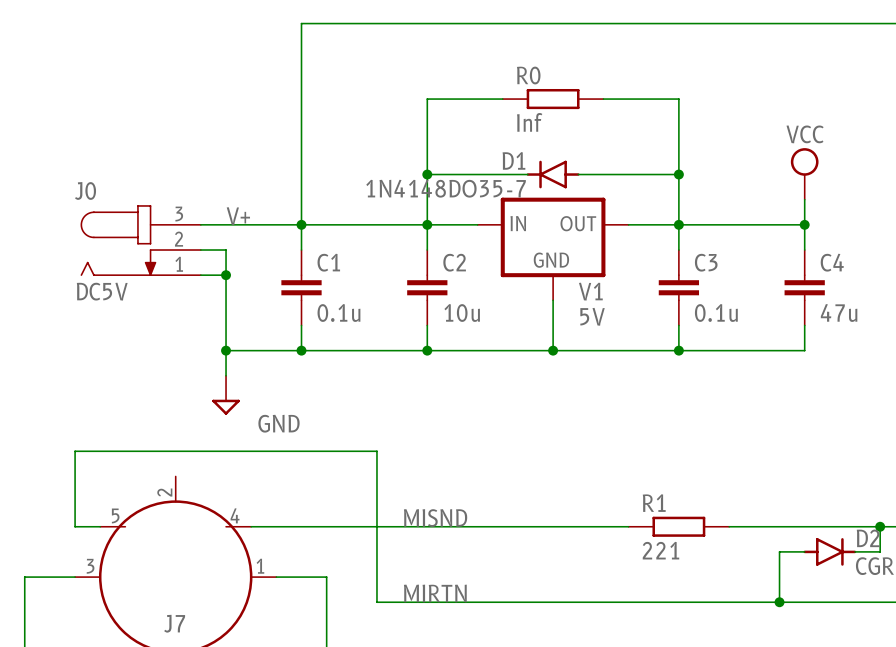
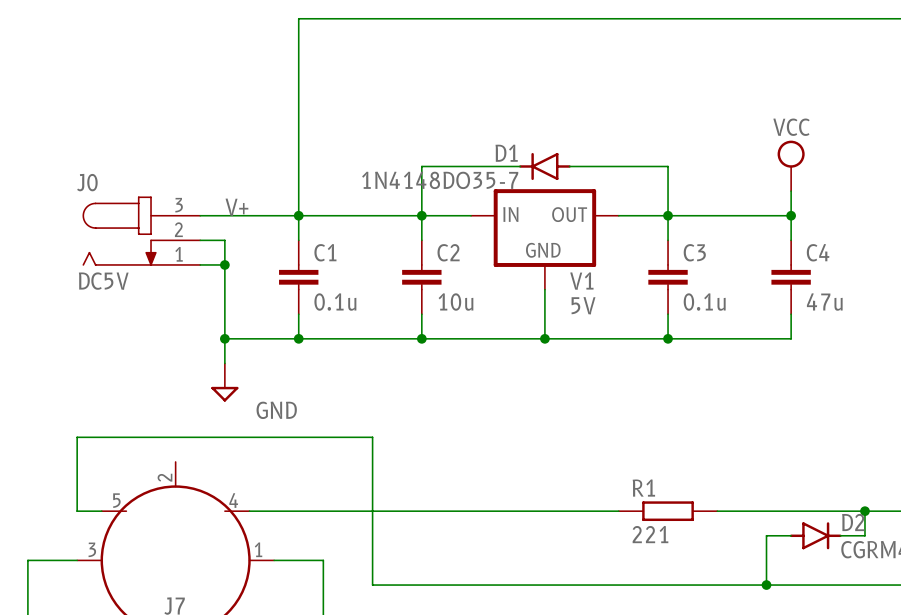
wire: (502, 99) (427, 99) (427, 174) -> none
R0: Inf (553, 99) -> none
wire: (603, 99) (678, 99) (678, 174) -> none
junction: (427, 174) -> none
junction: (678, 174) -> none
label: MISND (435, 518) -> none
label: MIRTN (435, 593) -> none

